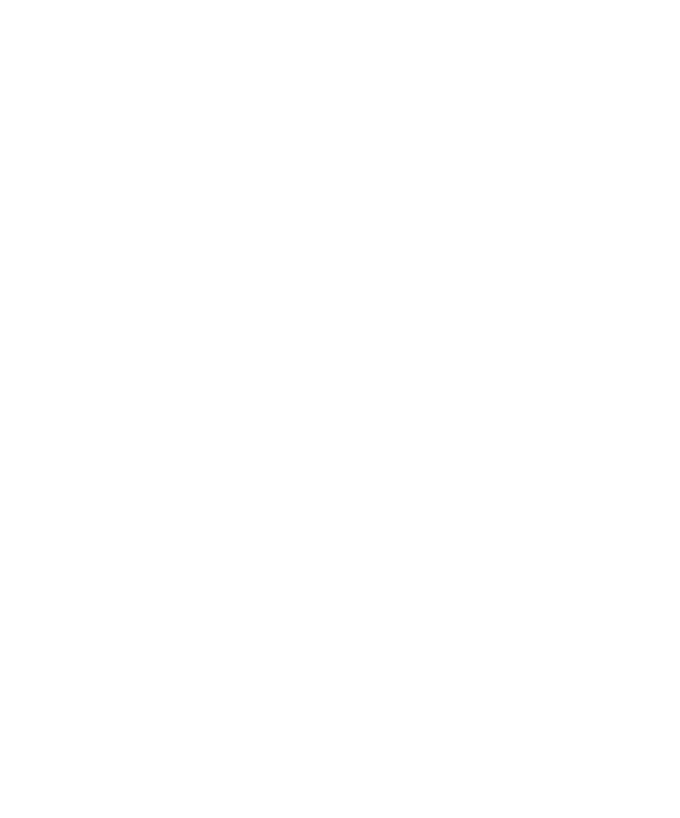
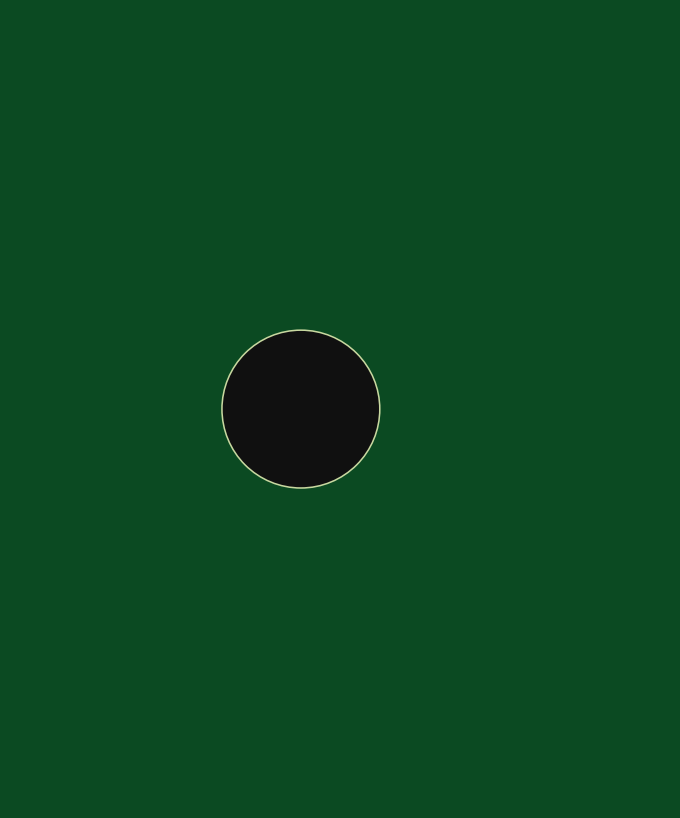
part: none -> (300, 409)

